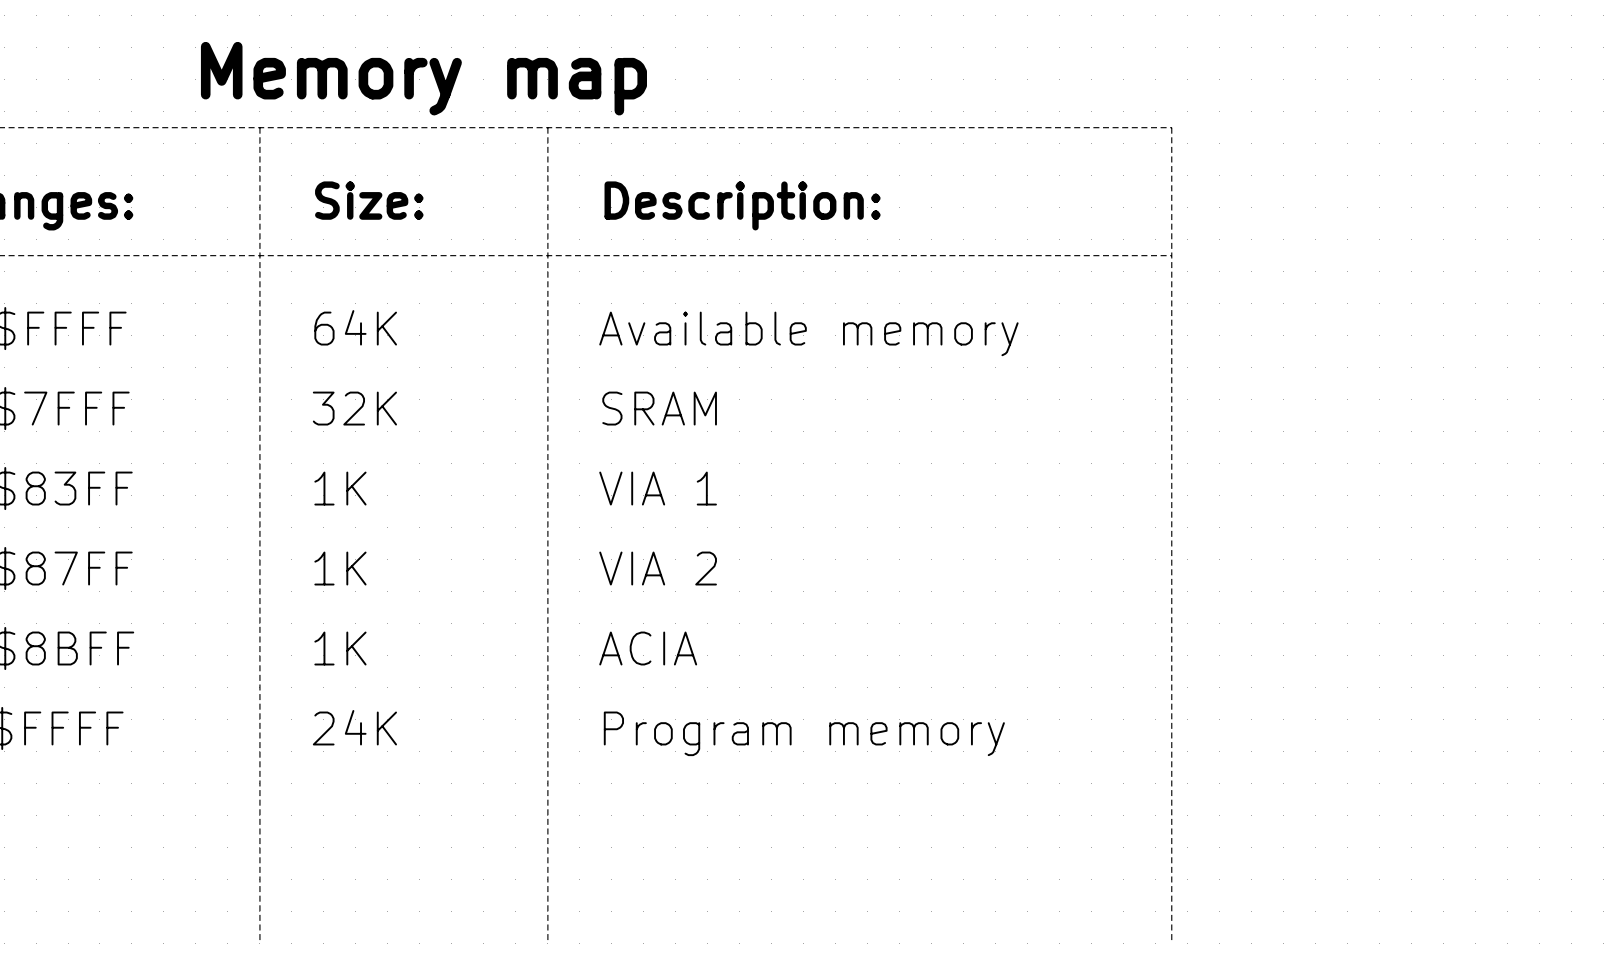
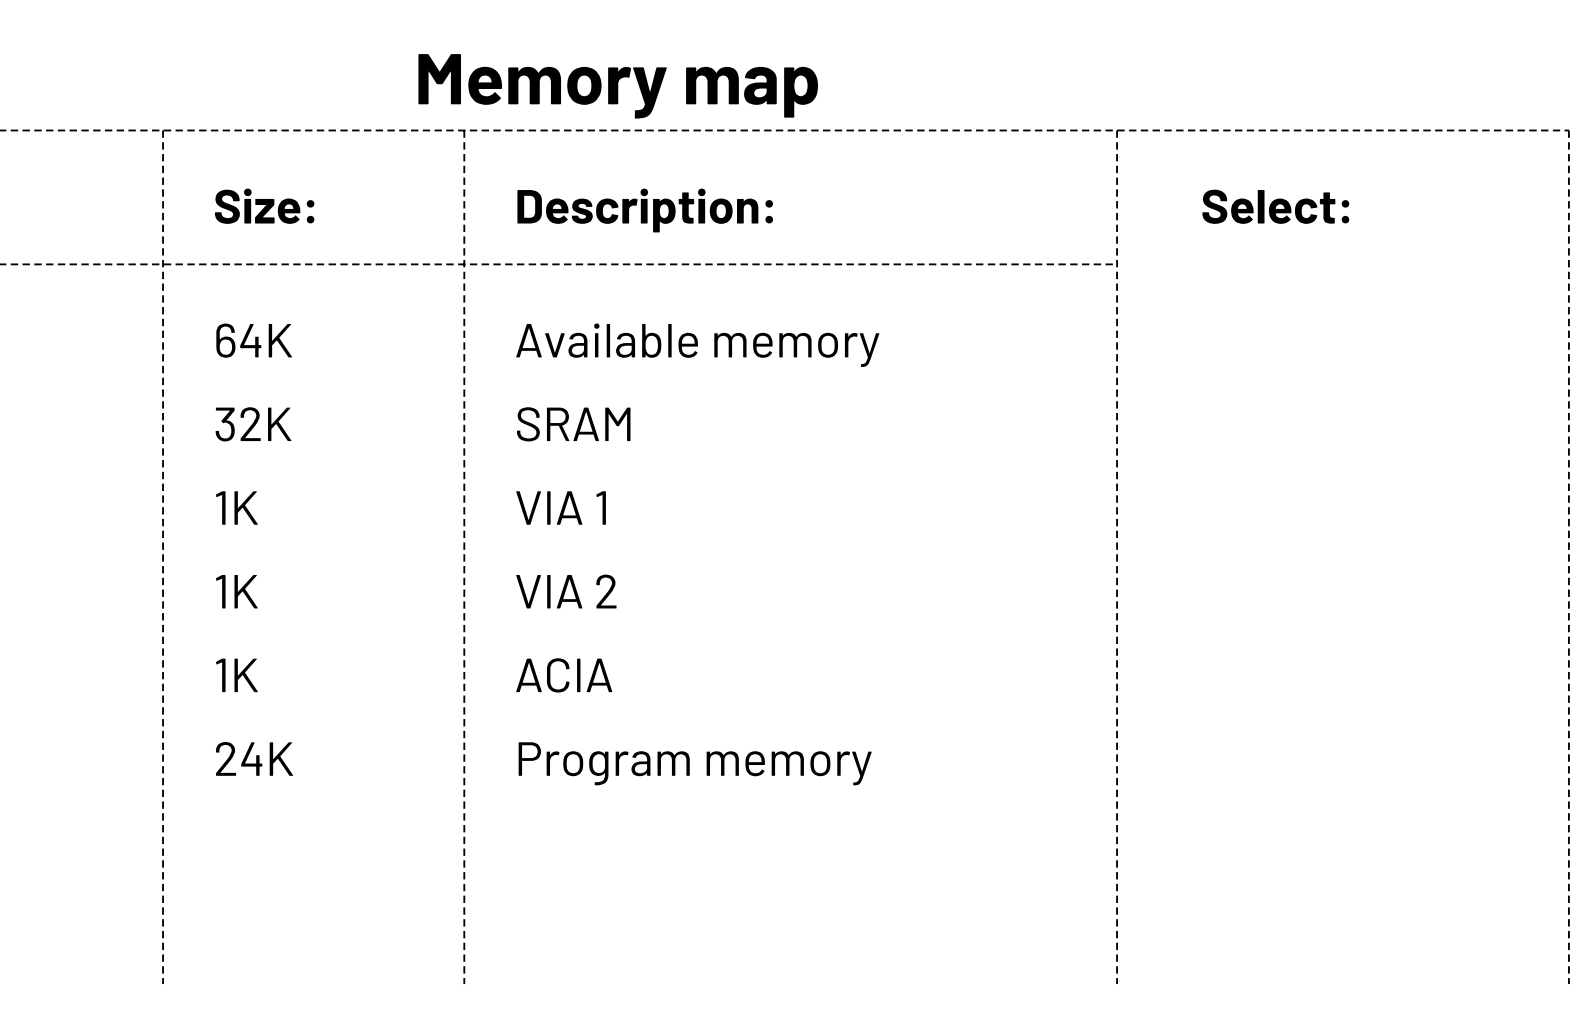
text position: Memory map (423, 78) -> Memory map (618, 86)
line: none -> (1117, 130) (1568, 130) (1568, 984)
text: none -> Select: (1275, 206)

